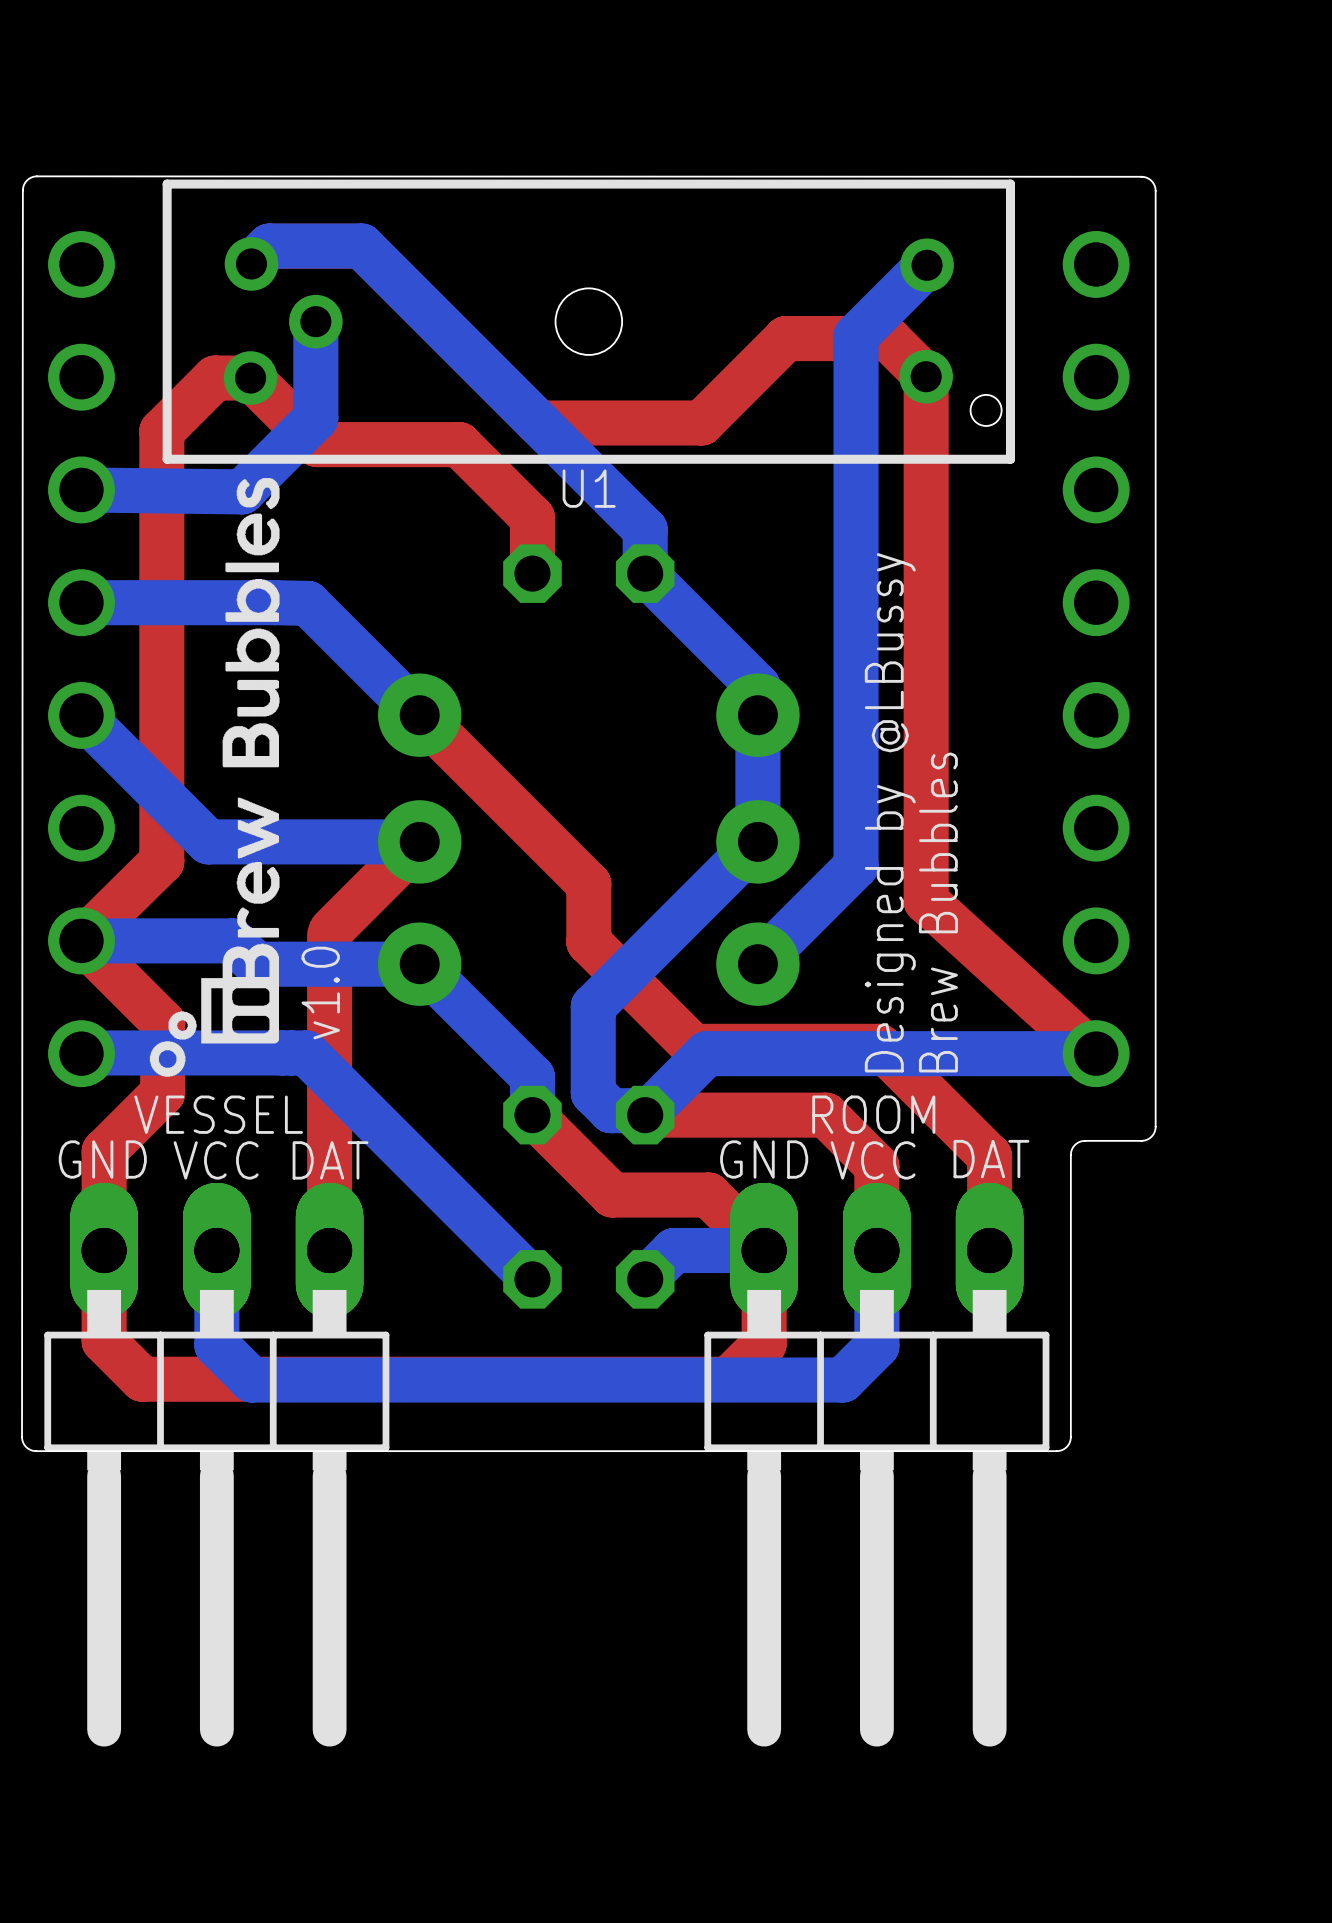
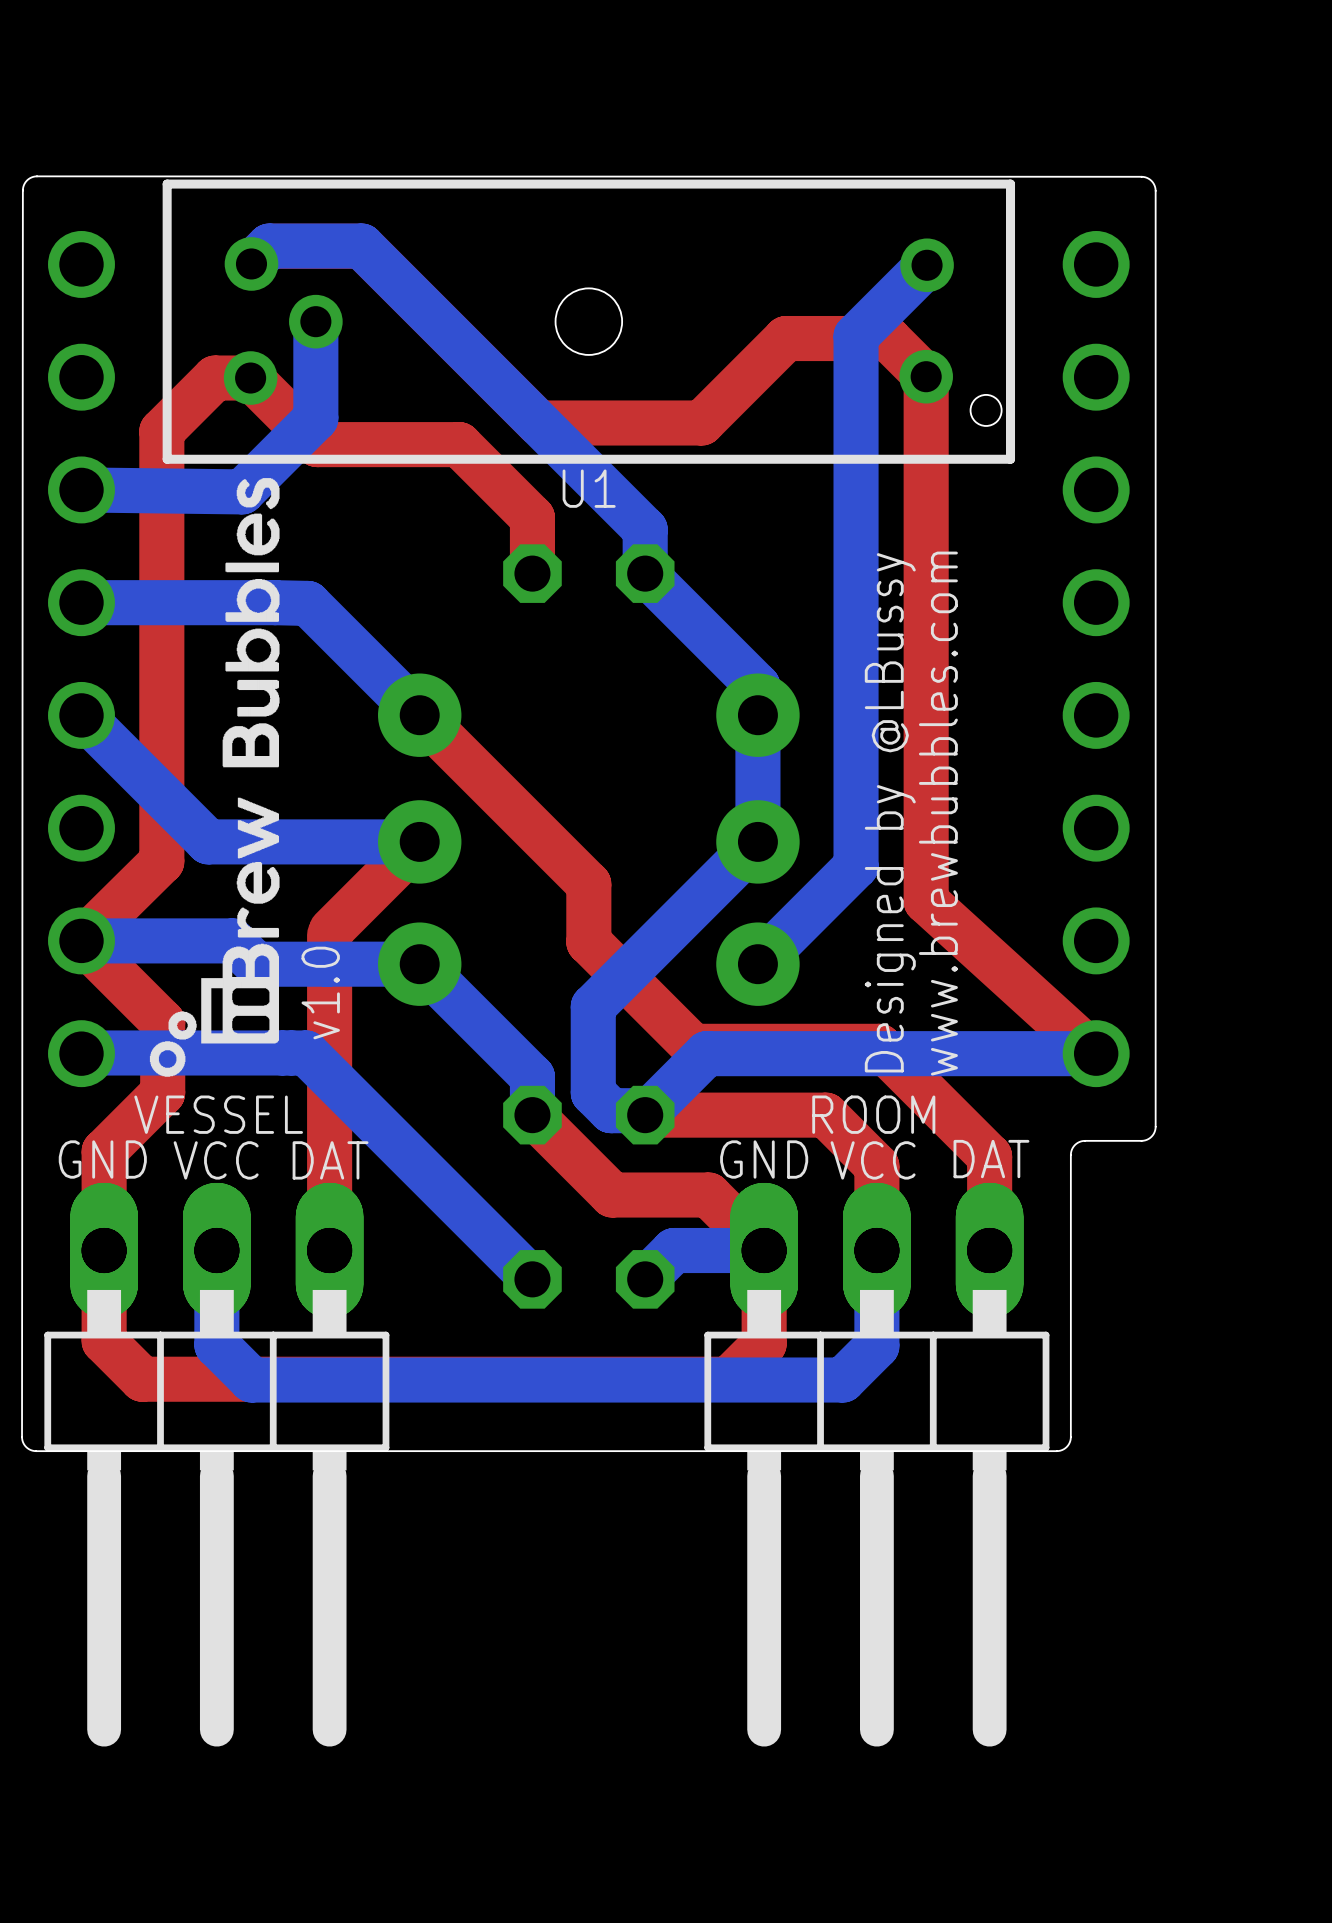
text: Brew Bubbles (938, 912) -> www.brewbubbles.com (938, 813)

